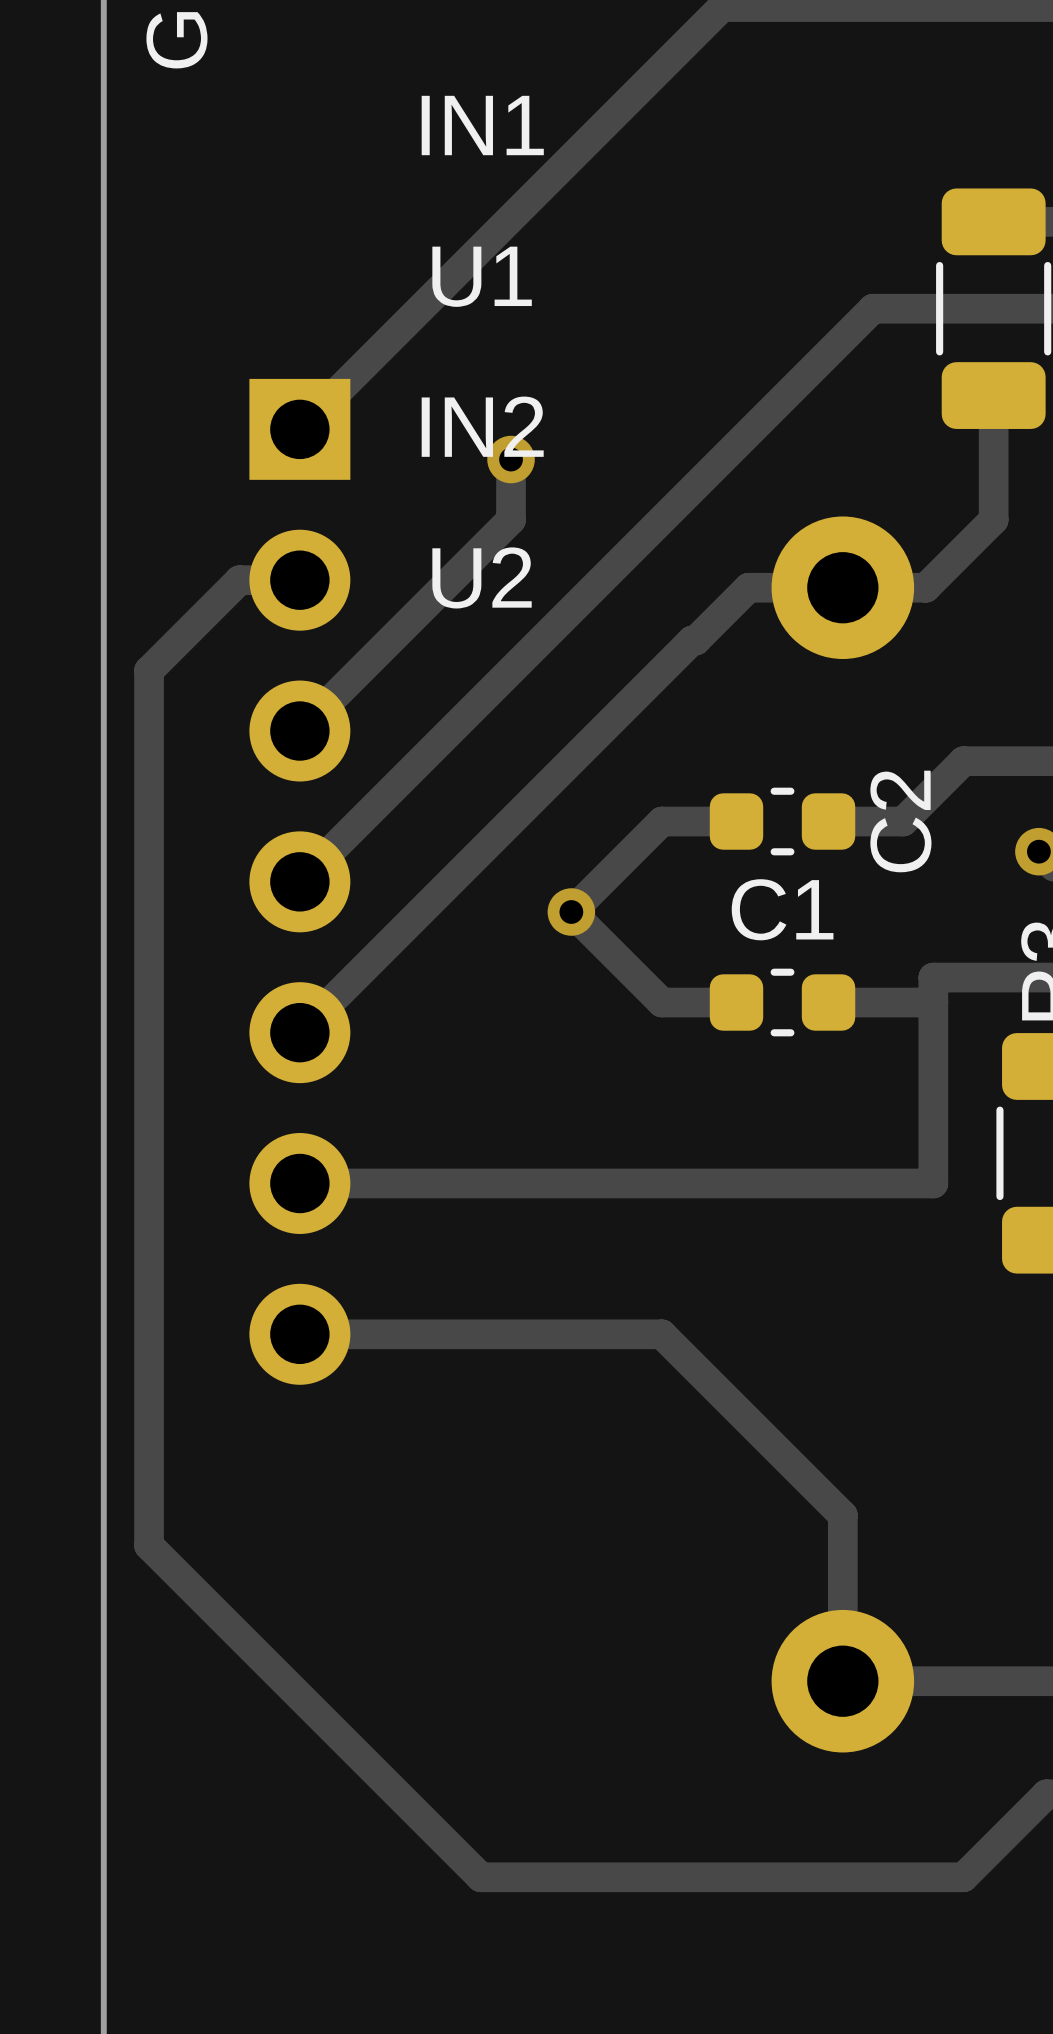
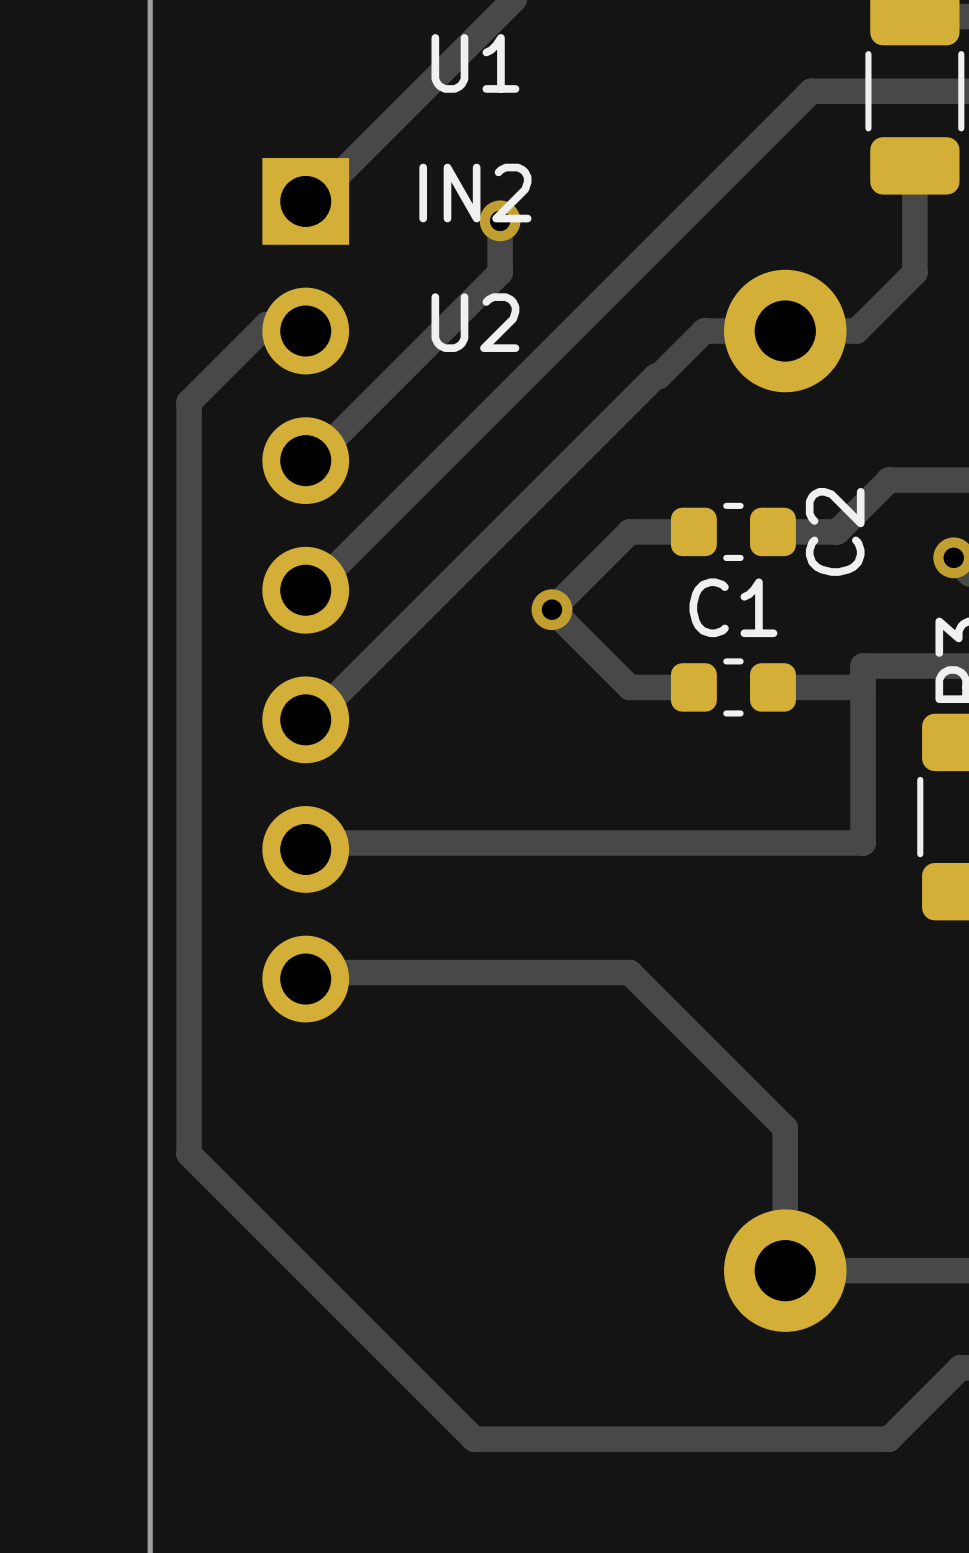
part position: (299, 881) -> (305, 590)

